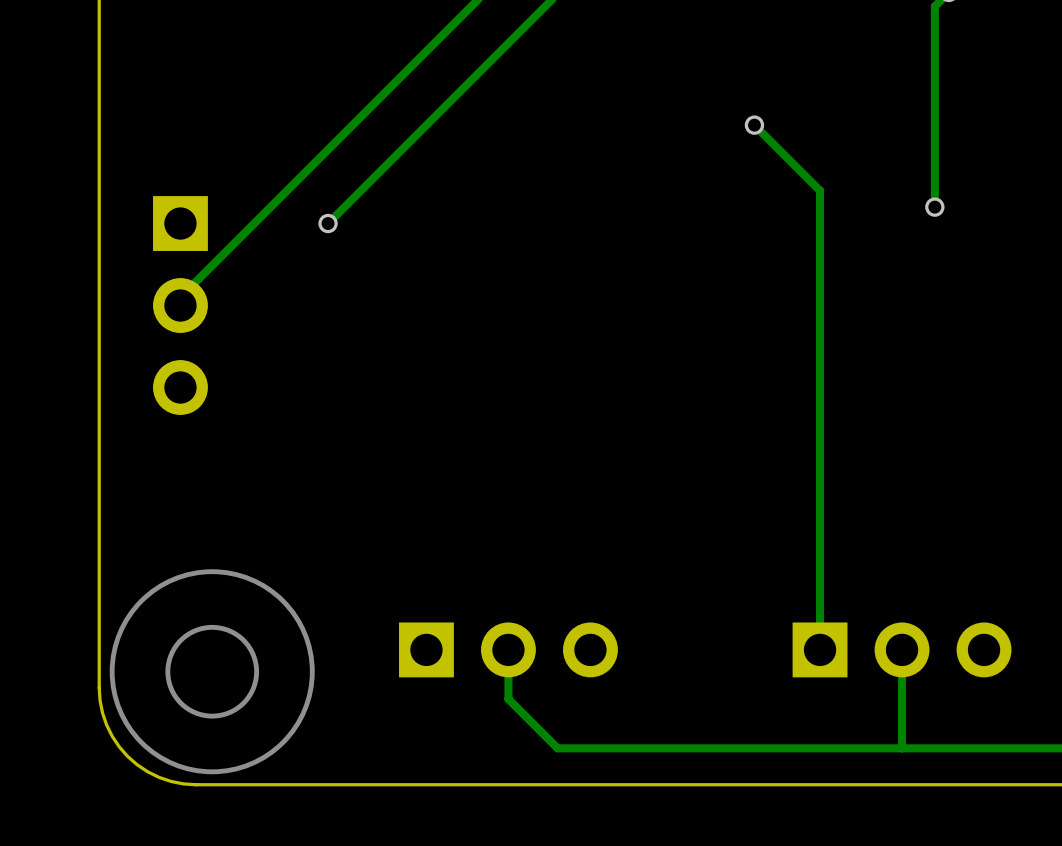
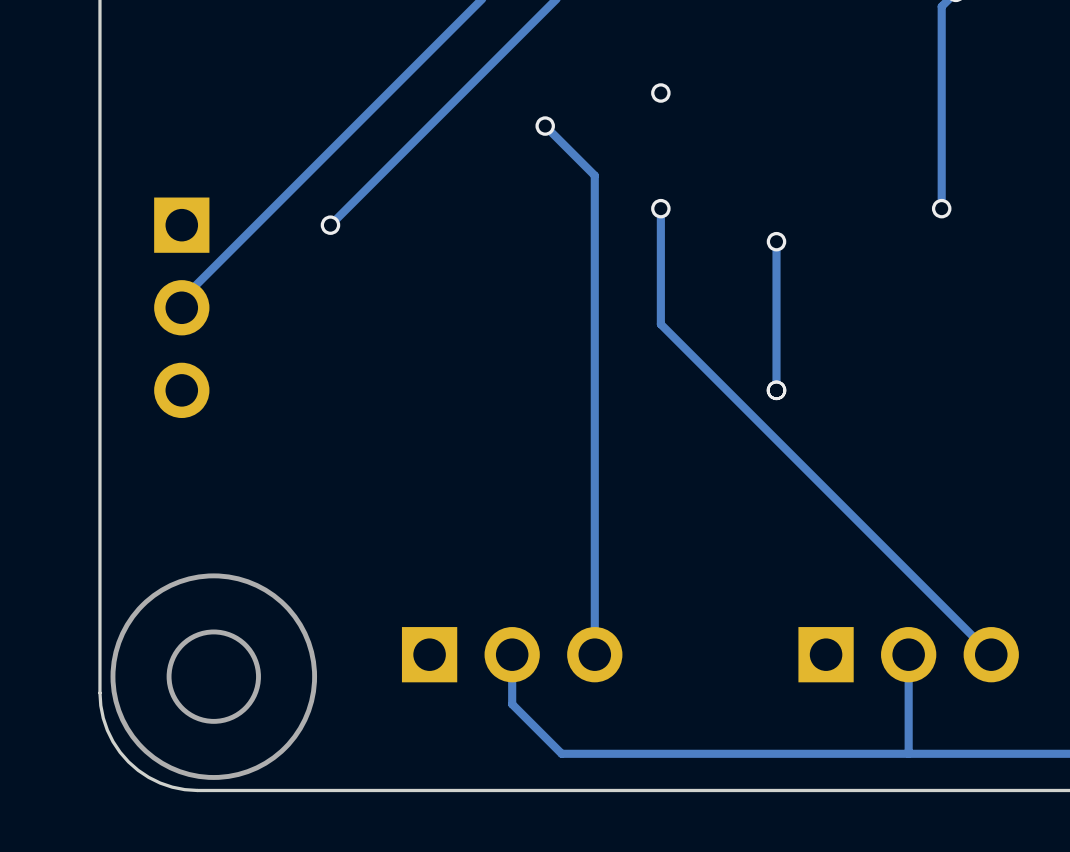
via: none -> (660, 93)
track: none -> (545, 126) (594, 175) (594, 654)
via: none -> (545, 126)
track: (754, 125) (820, 190) (820, 649) -> none
via: (754, 125) -> none
track: none -> (660, 208) (660, 324) (991, 654)
via: none -> (660, 208)
track: none -> (776, 241) (776, 390)
via: none -> (776, 241)
via: none -> (776, 390)

